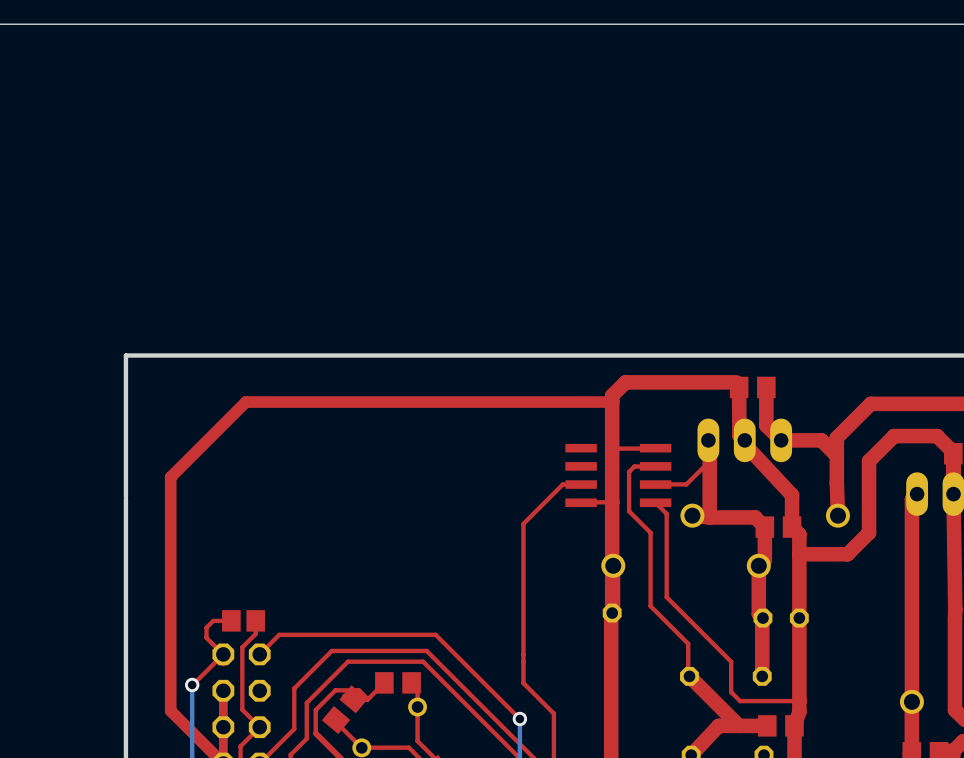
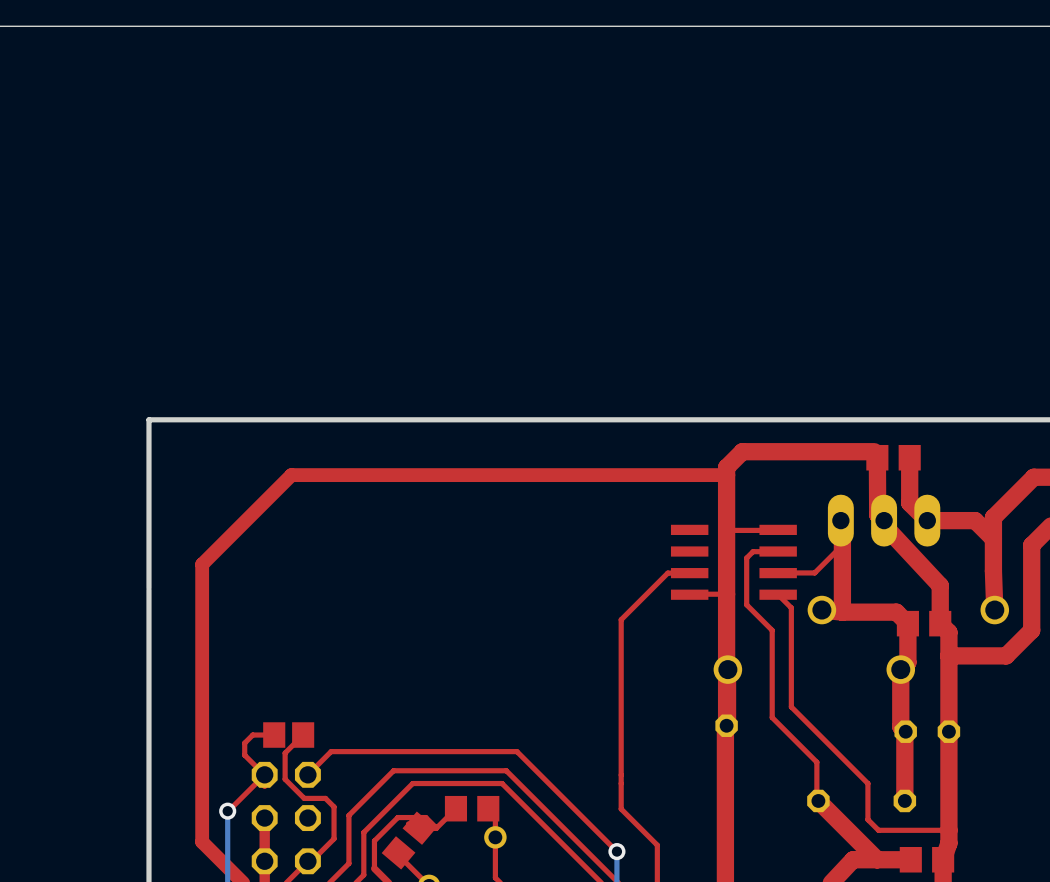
top track: (255, 620) (255, 633) (242, 647) (242, 709) (259, 727) -> (303, 735) (285, 753) (285, 779) (304, 798) (325, 798) (334, 806) (334, 838) (311, 861) (307, 861)

